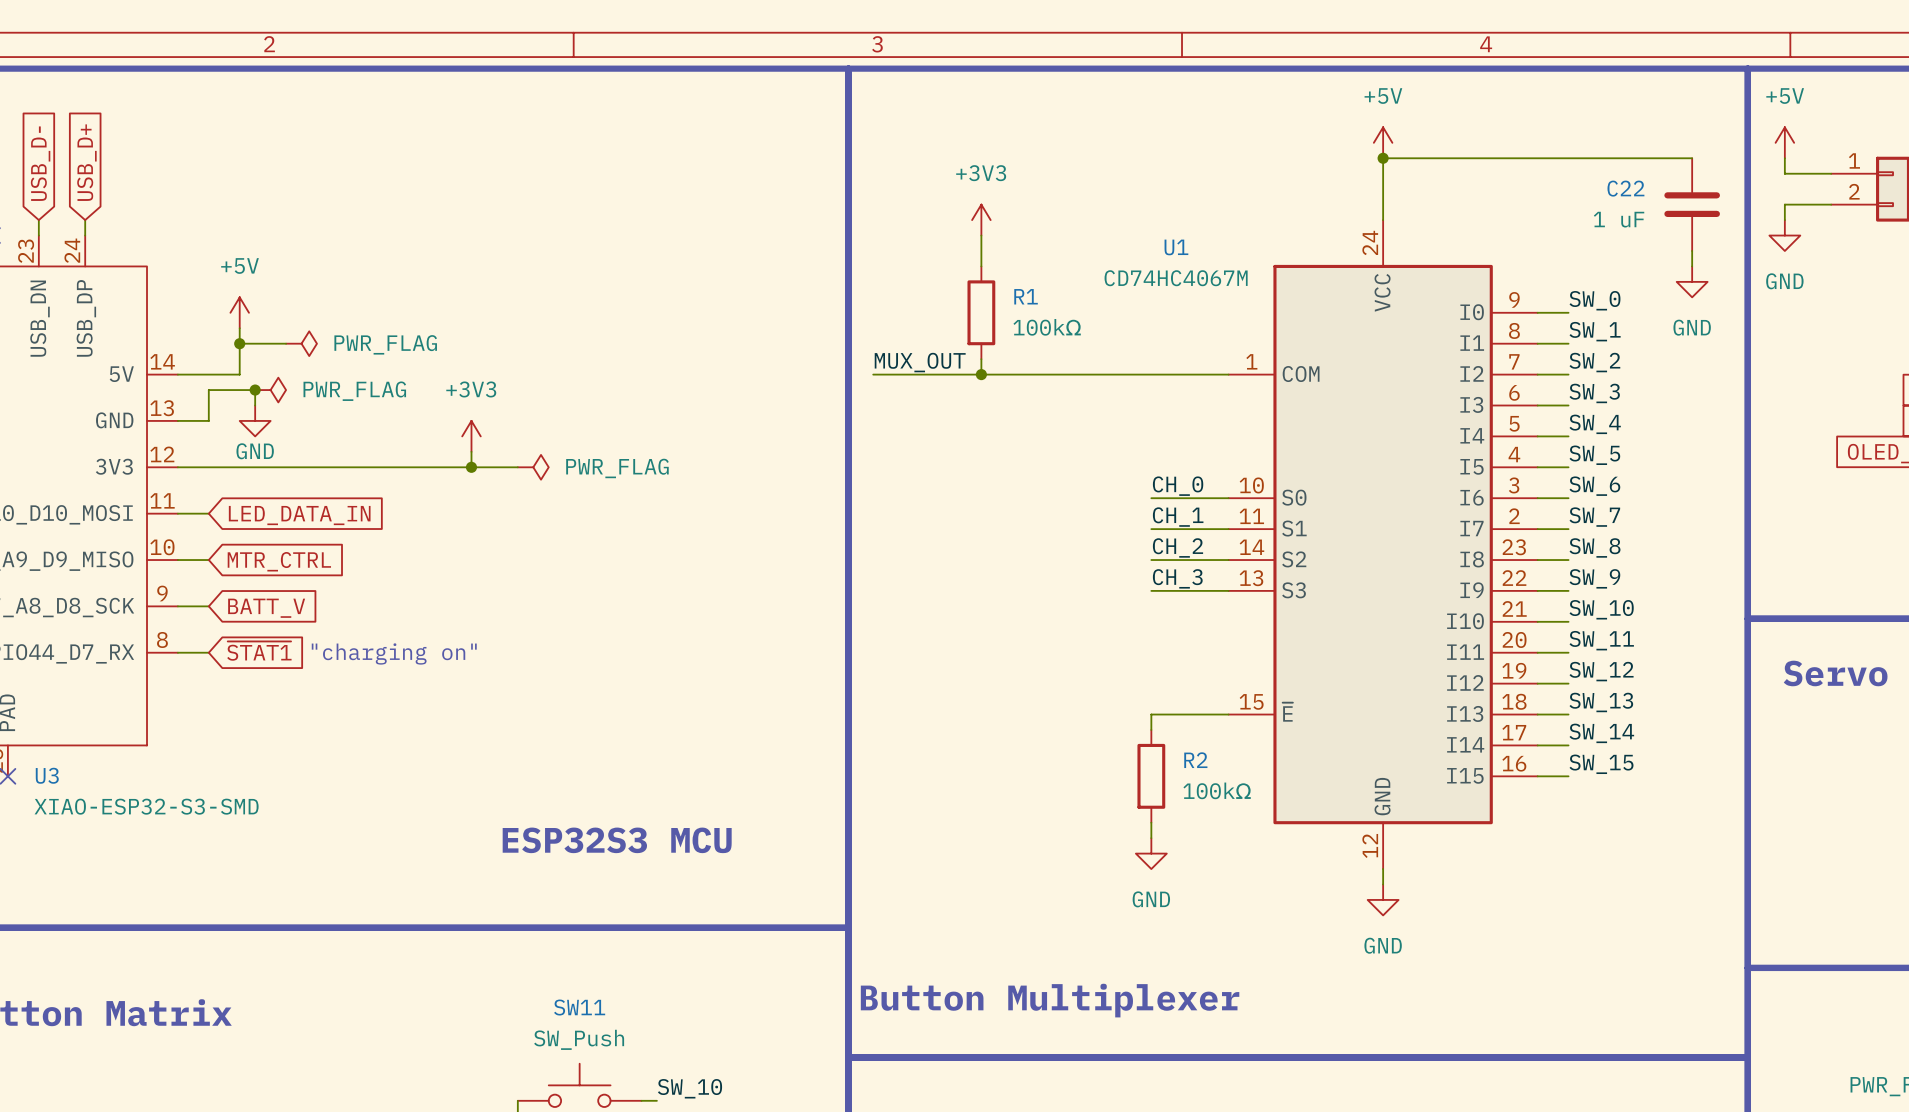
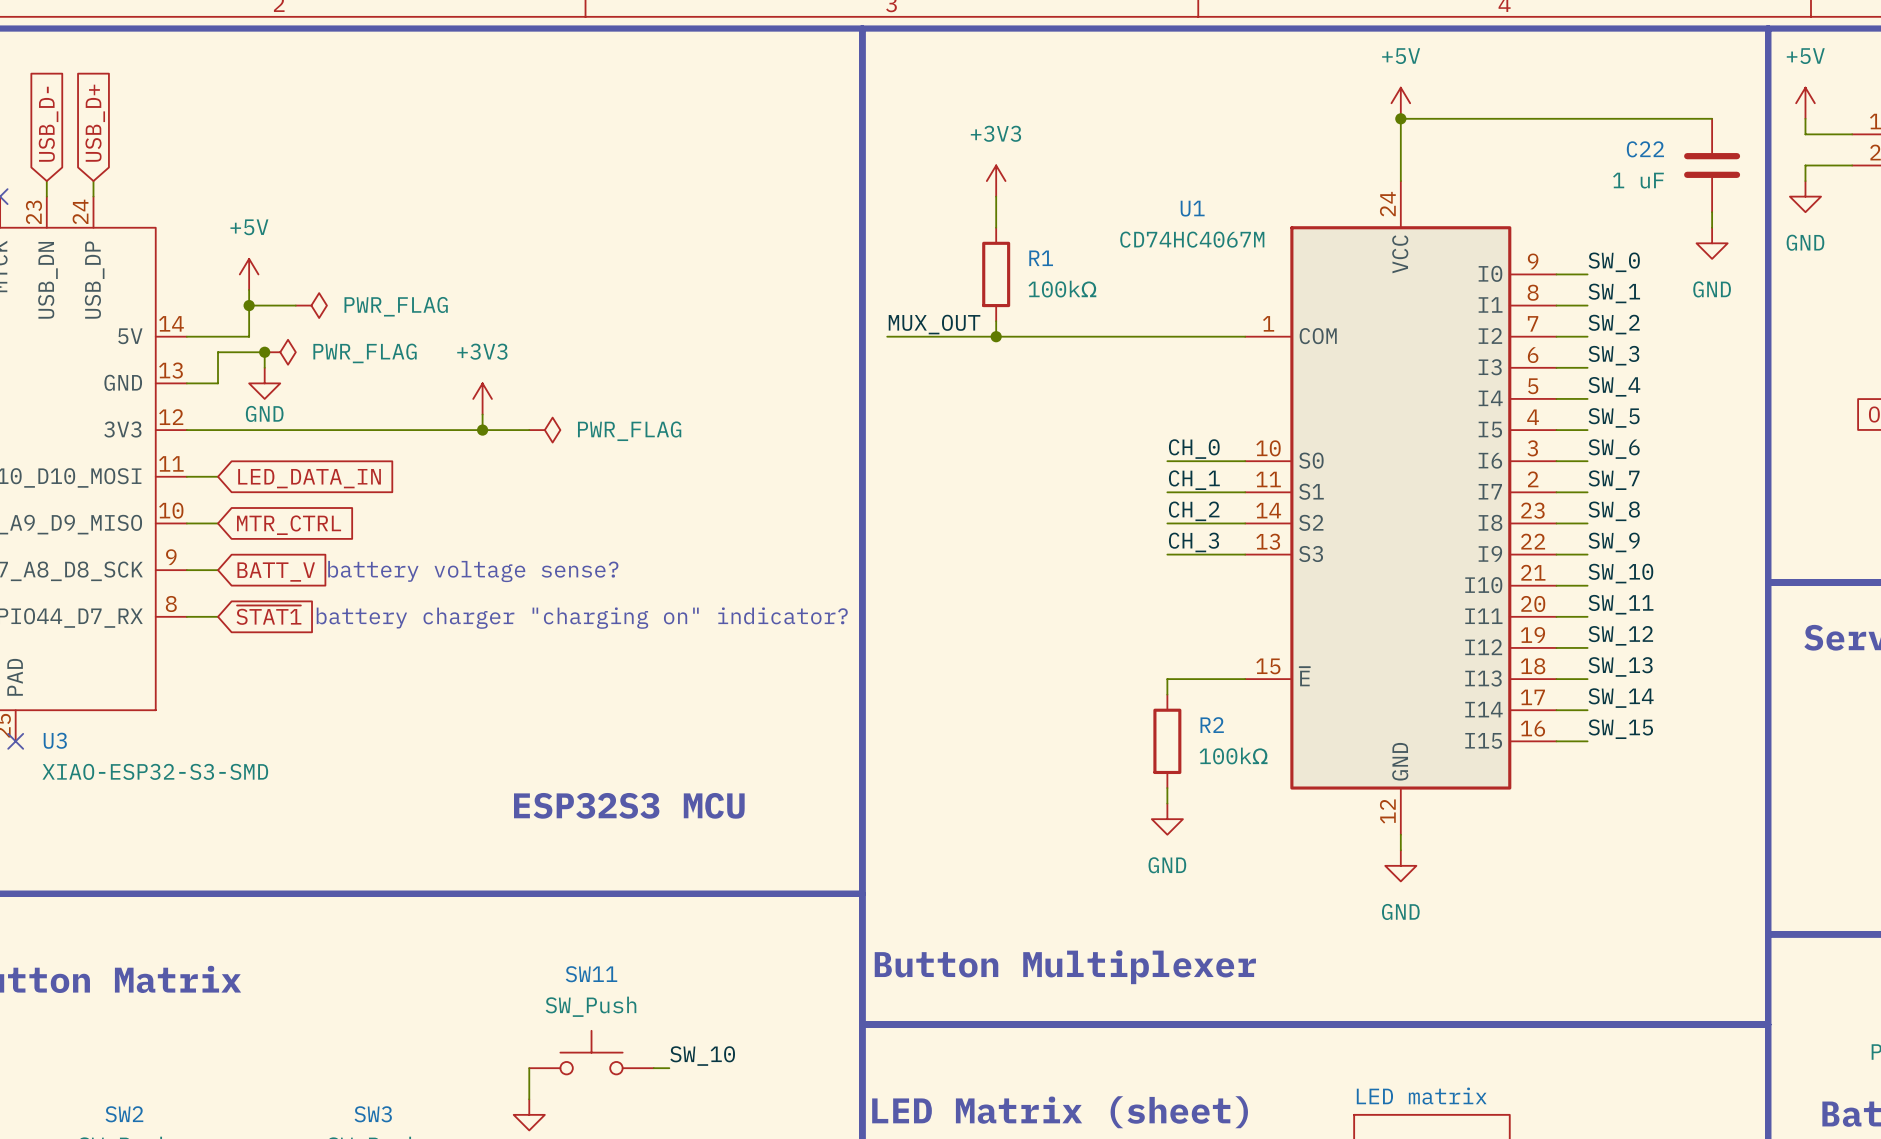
text: none -> battery voltage sense? (473, 571)
text: "charging on" (394, 653) -> none
text: none -> battery charger "charging on" indicator? (582, 618)

